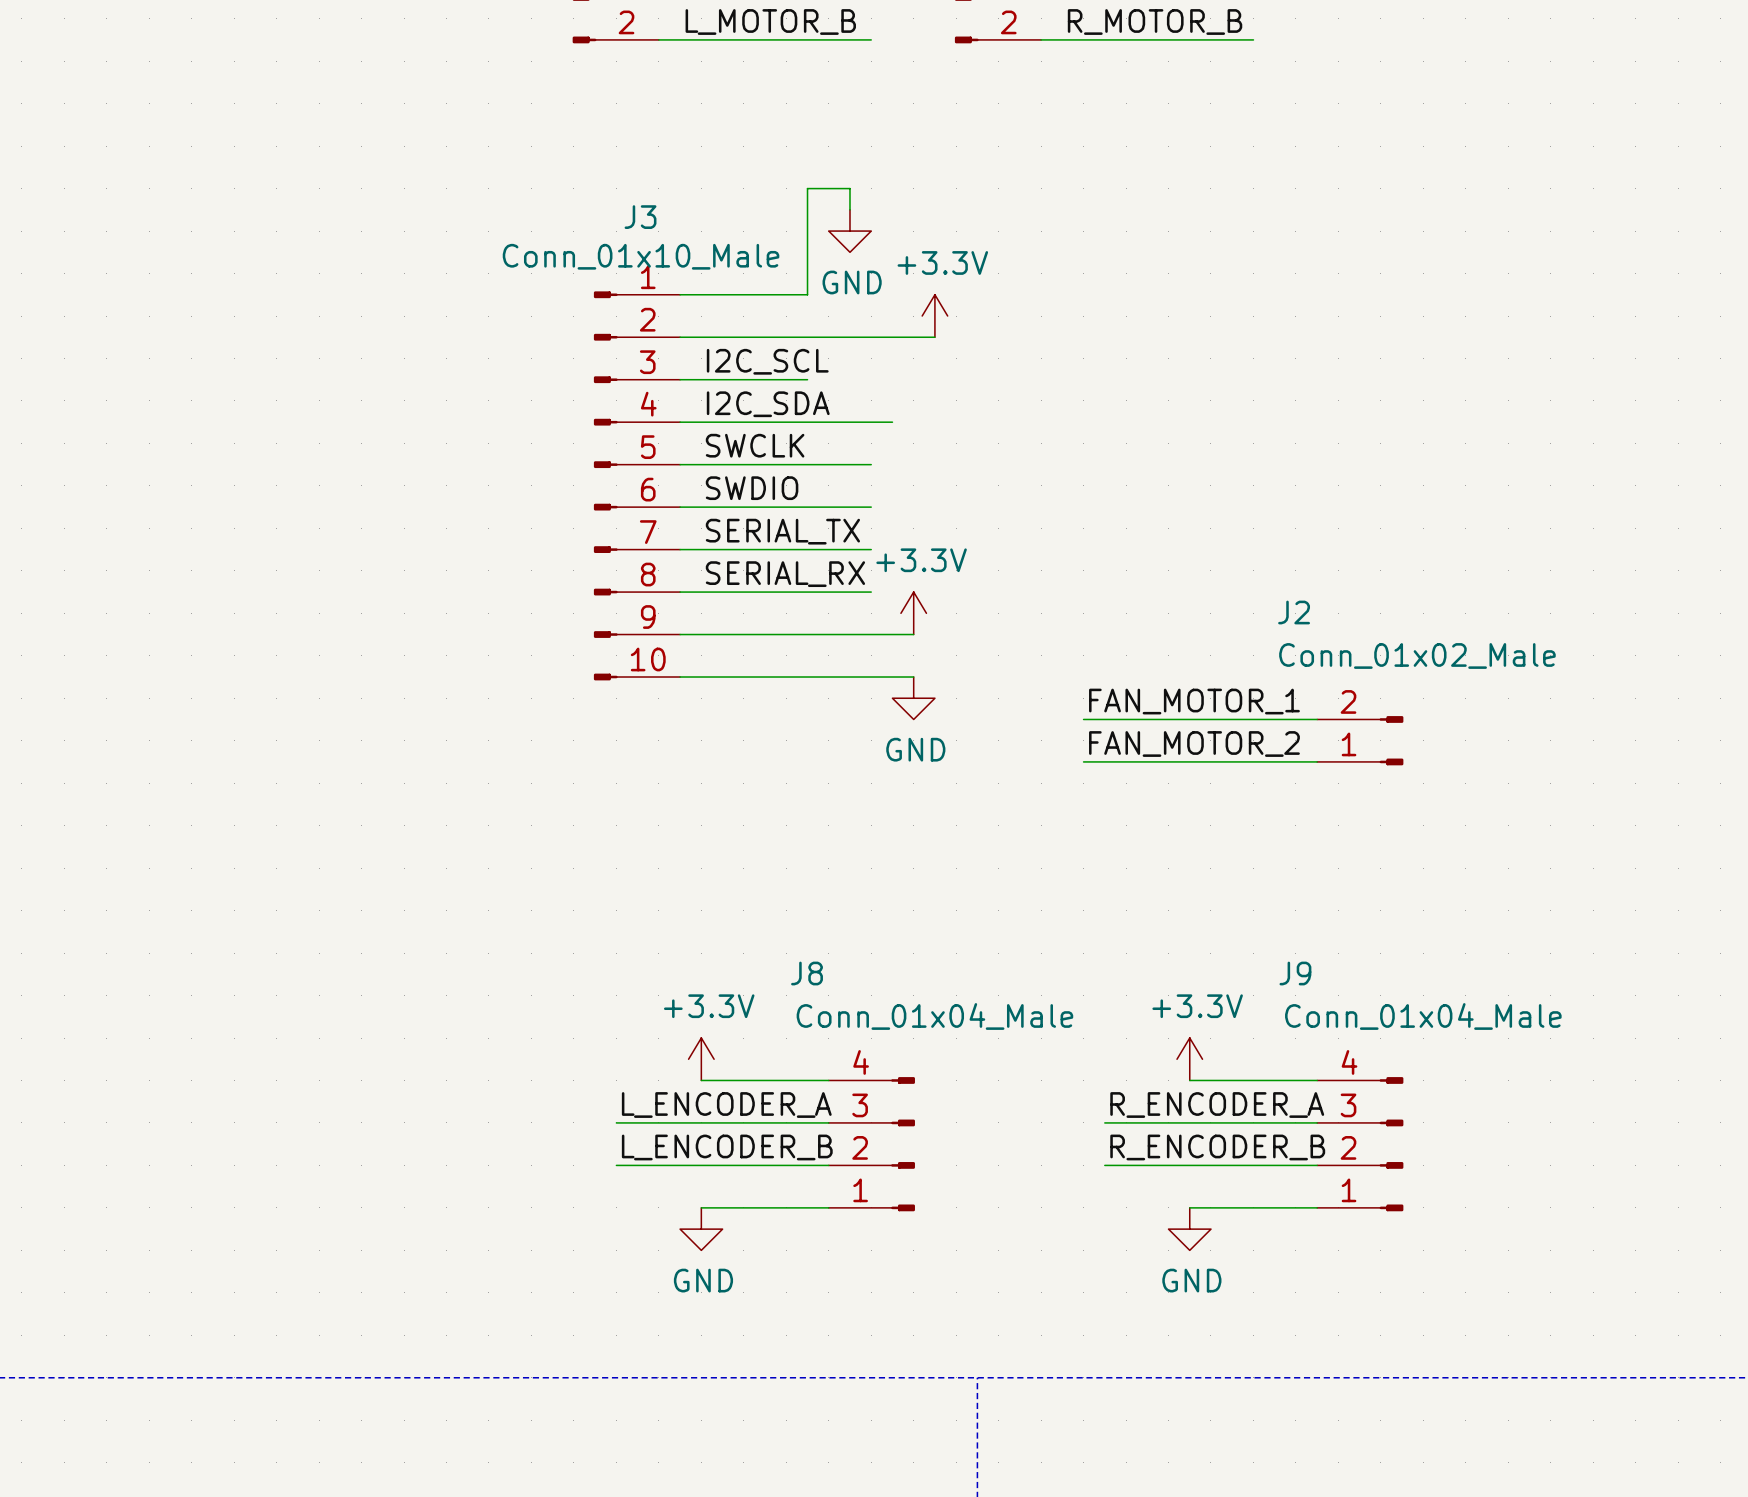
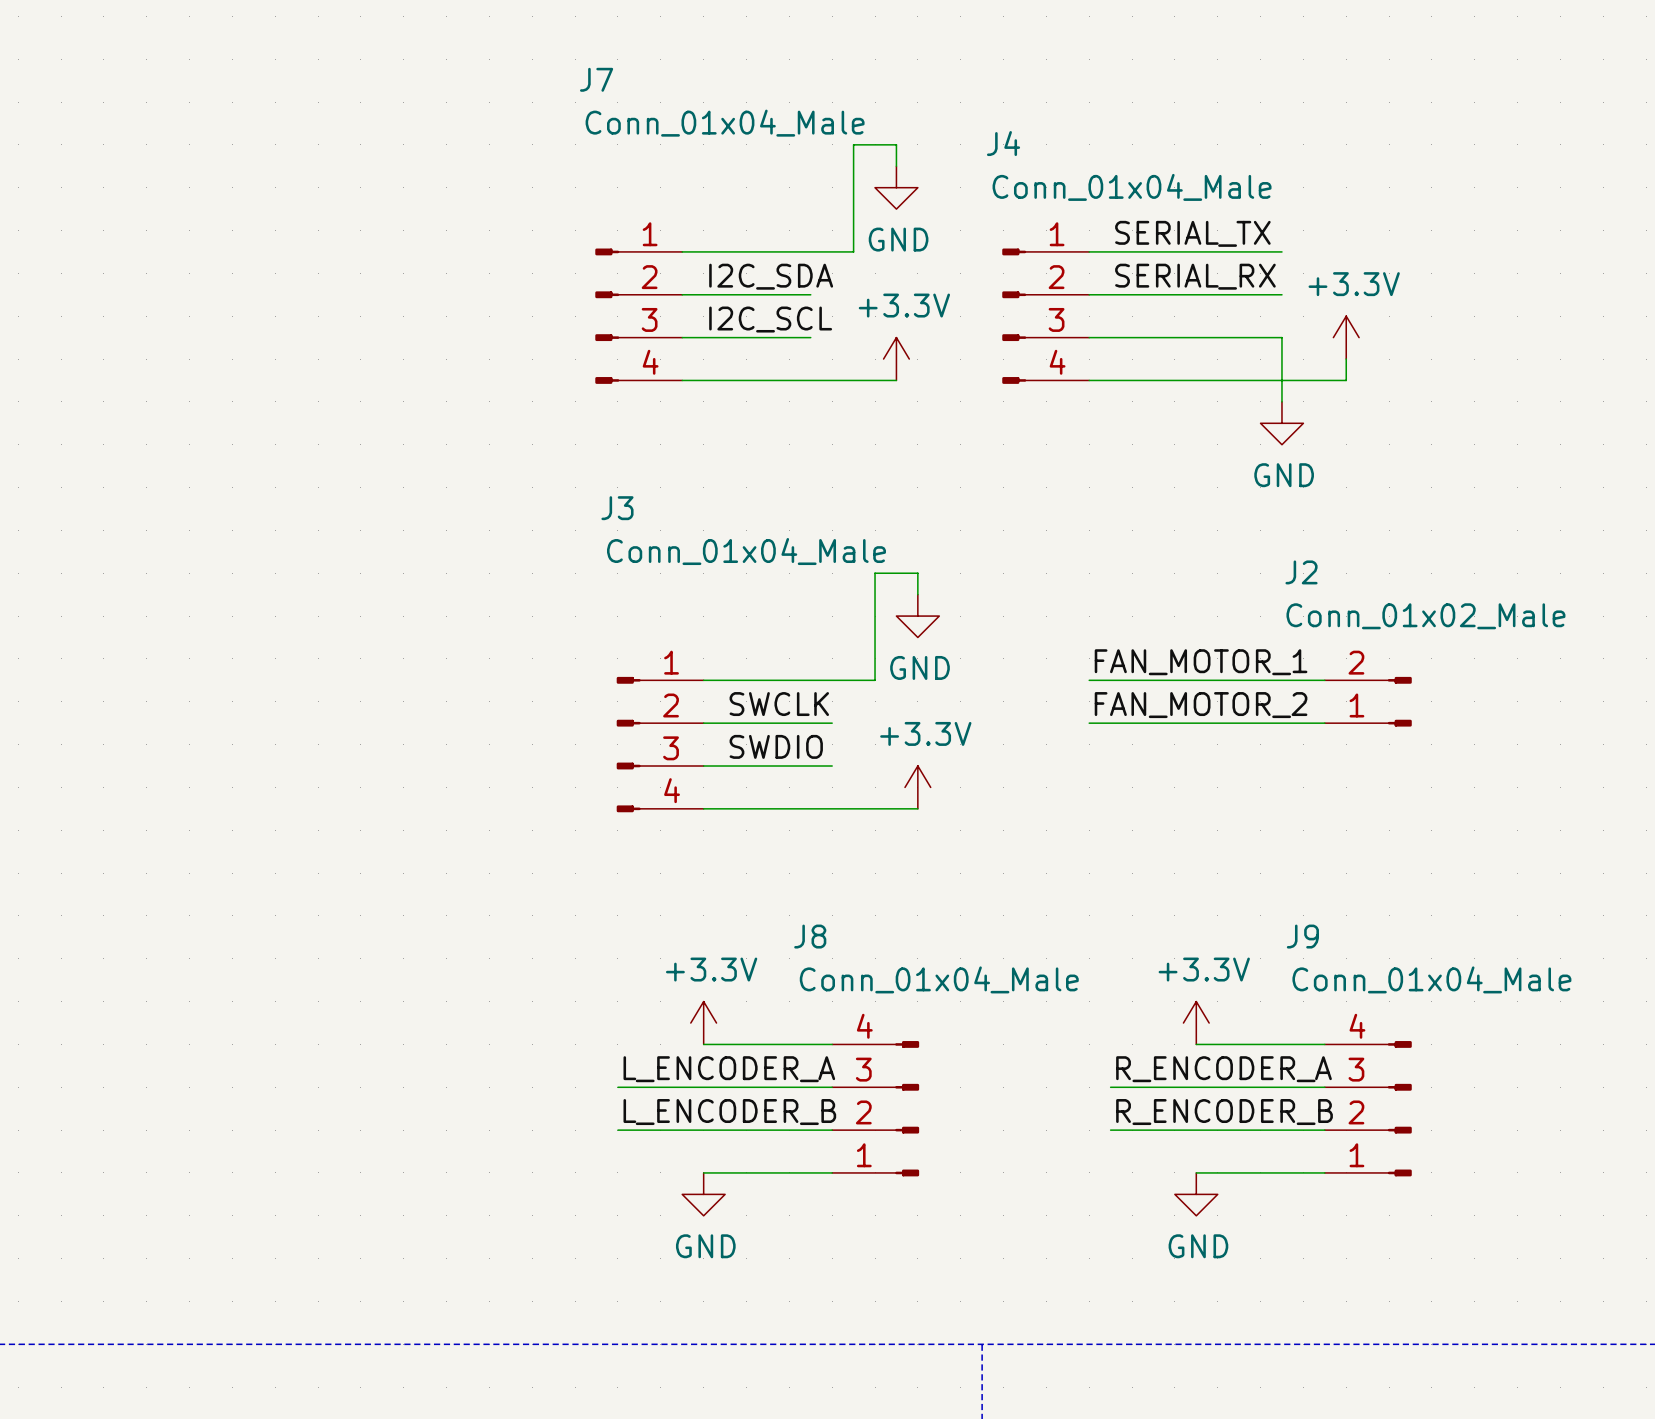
wire: (849, 188) (807, 188) (807, 294) -> (853, 166) (853, 251) (810, 251)
wire: none -> (853, 144) (896, 144) (896, 166)
J3 name position: J3 (640, 217) -> J3 (617, 508)
power symbol position: GND (849, 231) -> GND (896, 187)
J3 value: Conn_01x10_Male (641, 256) -> Conn_01x04_Male (746, 551)
label: none -> SERIAL_TX (1192, 233)
J3 symbol: [593, 291, 681, 681] -> [616, 676, 704, 813]
wire: none -> (1089, 251) (1281, 251)
power symbol position: +3.3V (934, 316) -> +3.3V (896, 359)
label: none -> SERIAL_RX (1195, 276)
wire: (807, 337) (934, 337) -> none
wire: none -> (1089, 294) (1281, 294)
J7: none -> Conn_01x04_Male (638, 316)
J4: none -> Conn_01x04_Male (1045, 316)
wire: none -> (1089, 337) (1281, 337) (1281, 401)
power symbol: none -> +3.3V (1346, 337)
wire: none -> (1346, 359) (1346, 380) (1089, 380)
label position: I2C_SDA (768, 404) -> I2C_SDA (771, 276)
label position: SWCLK (755, 445) -> SWCLK (779, 704)
wire: (680, 464) (871, 464) -> none
power symbol: none -> GND (1281, 423)
label position: SWDIO (752, 488) -> SWDIO (776, 746)
wire: (680, 507) (871, 507) -> none
label: SERIAL_TX (782, 531) -> none
wire: (680, 549) (871, 549) -> none
label: SERIAL_RX (785, 574) -> none
wire: (680, 592) (871, 592) -> none
power symbol: +3.3V (913, 613) -> none
wire: (680, 634) (913, 634) -> (703, 680) (875, 680) (875, 573) (917, 573) (917, 594)
wire: (680, 677) (913, 677) -> none
power symbol position: GND (913, 698) -> GND (917, 616)
wire: none -> (703, 723) (832, 723)
wire: none -> (703, 766) (832, 766)
power symbol: none -> +3.3V (917, 787)
wire: none -> (703, 808) (917, 808)

